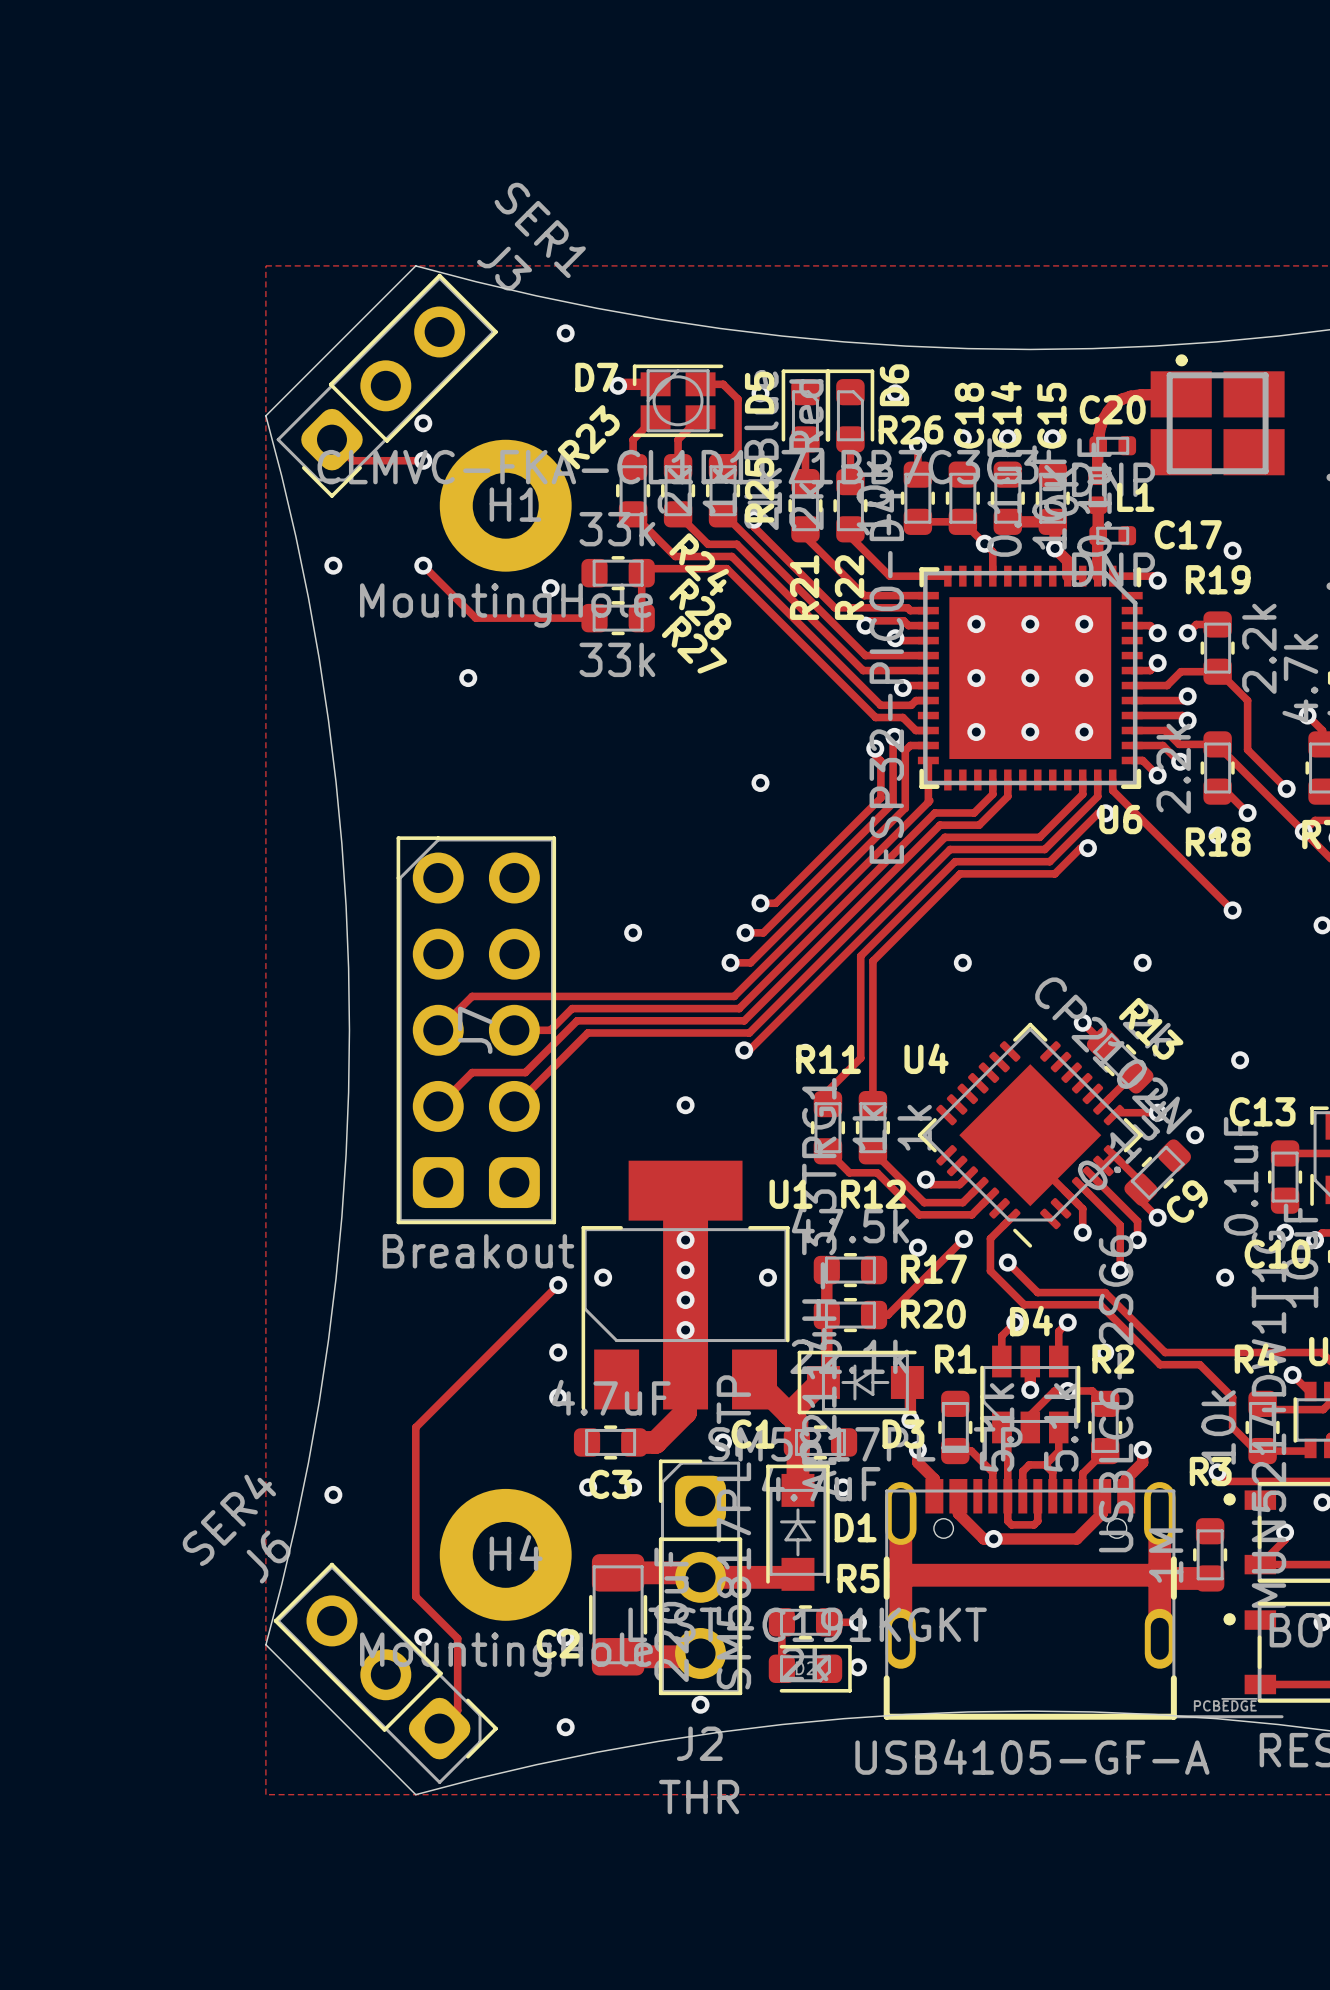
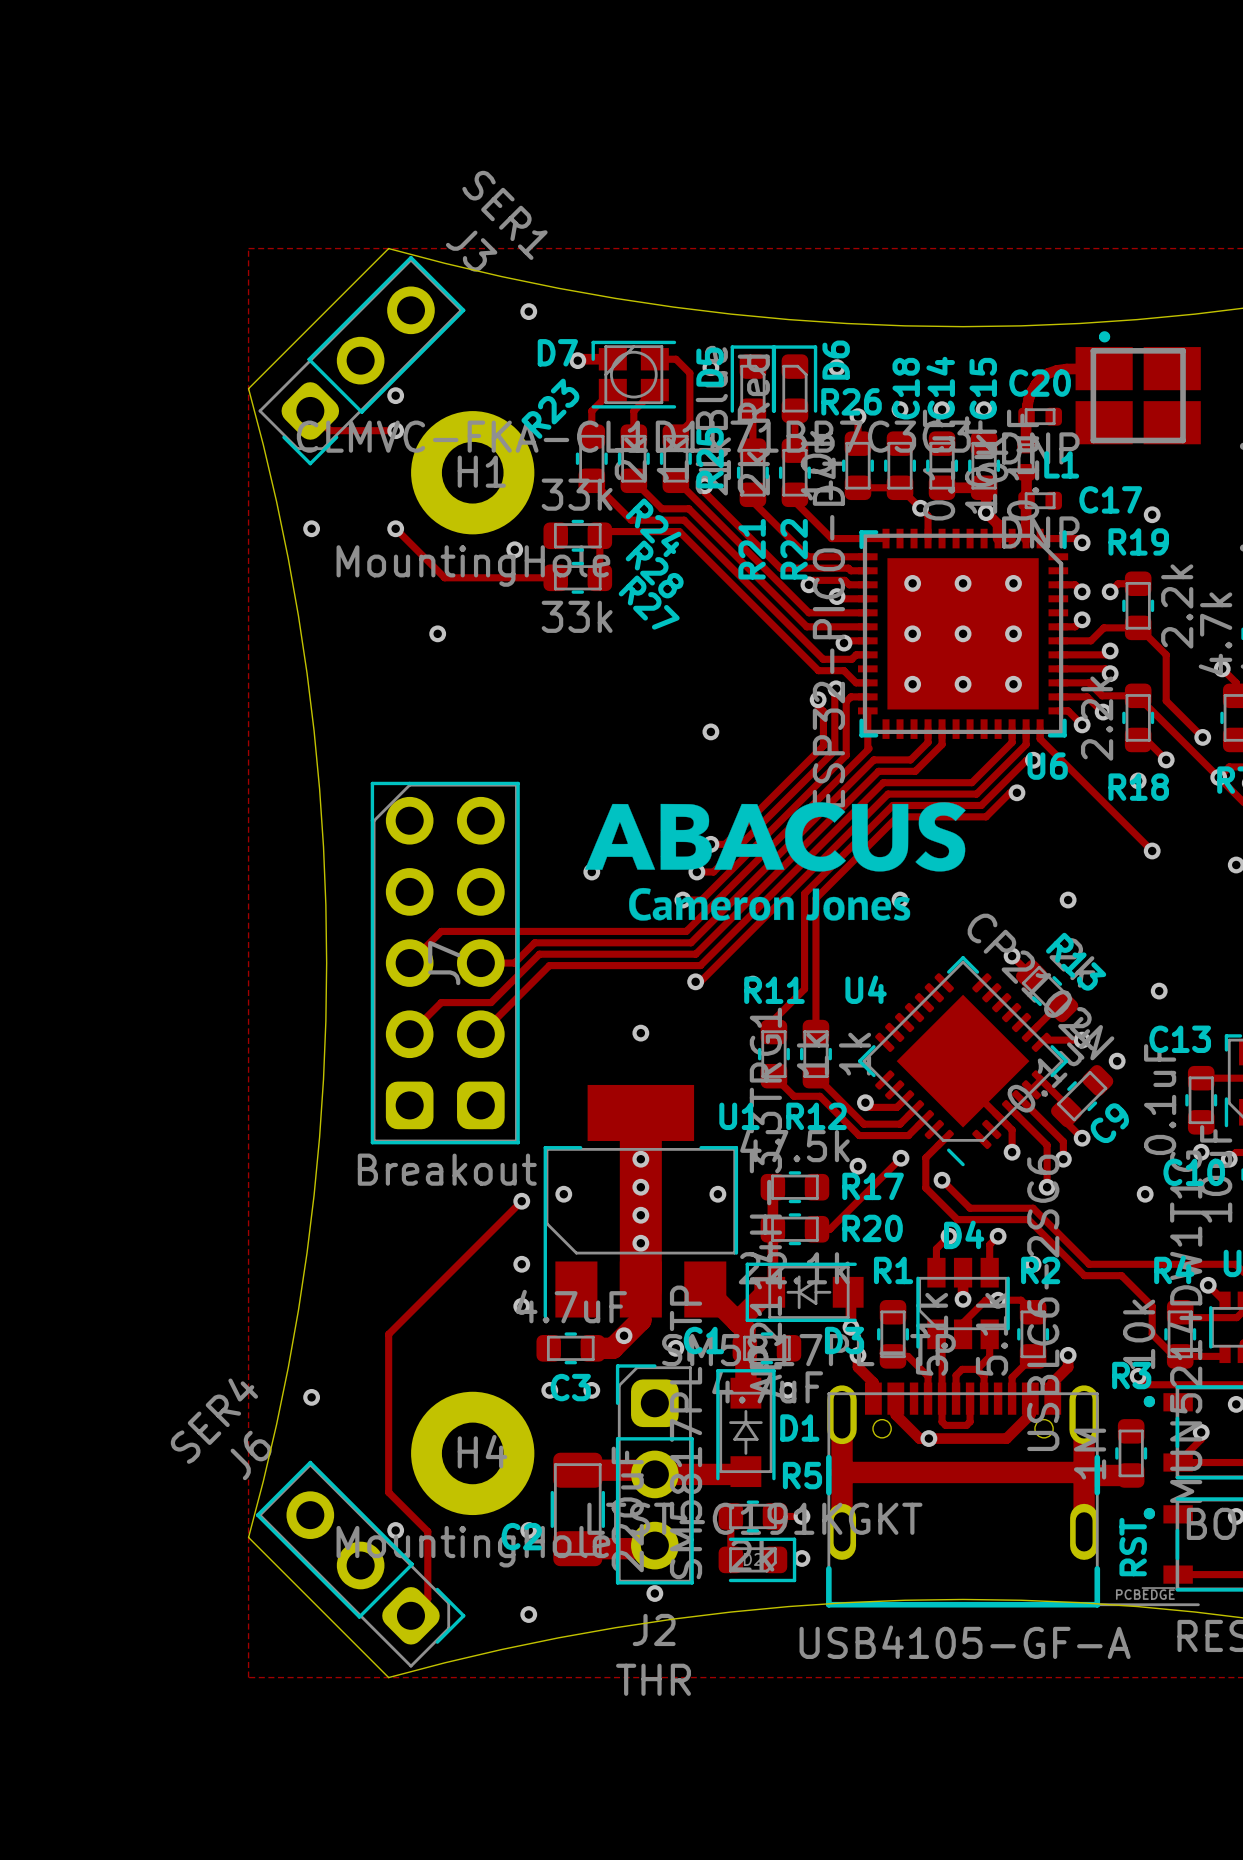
drawing: none -> [585, 802, 966, 921]
via: none -> (624, 1335)
text: none -> RST (1133, 1547)

